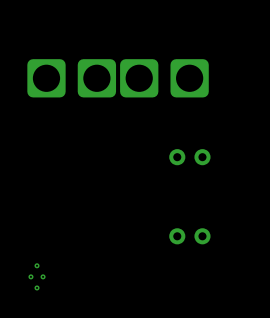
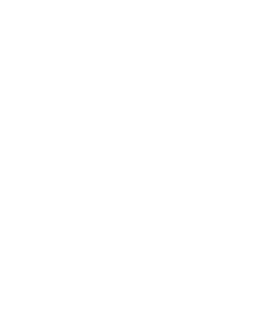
part: (118, 78) -> none
part: (189, 157) -> none
part: (189, 236) -> none
part: (37, 276) -> none

